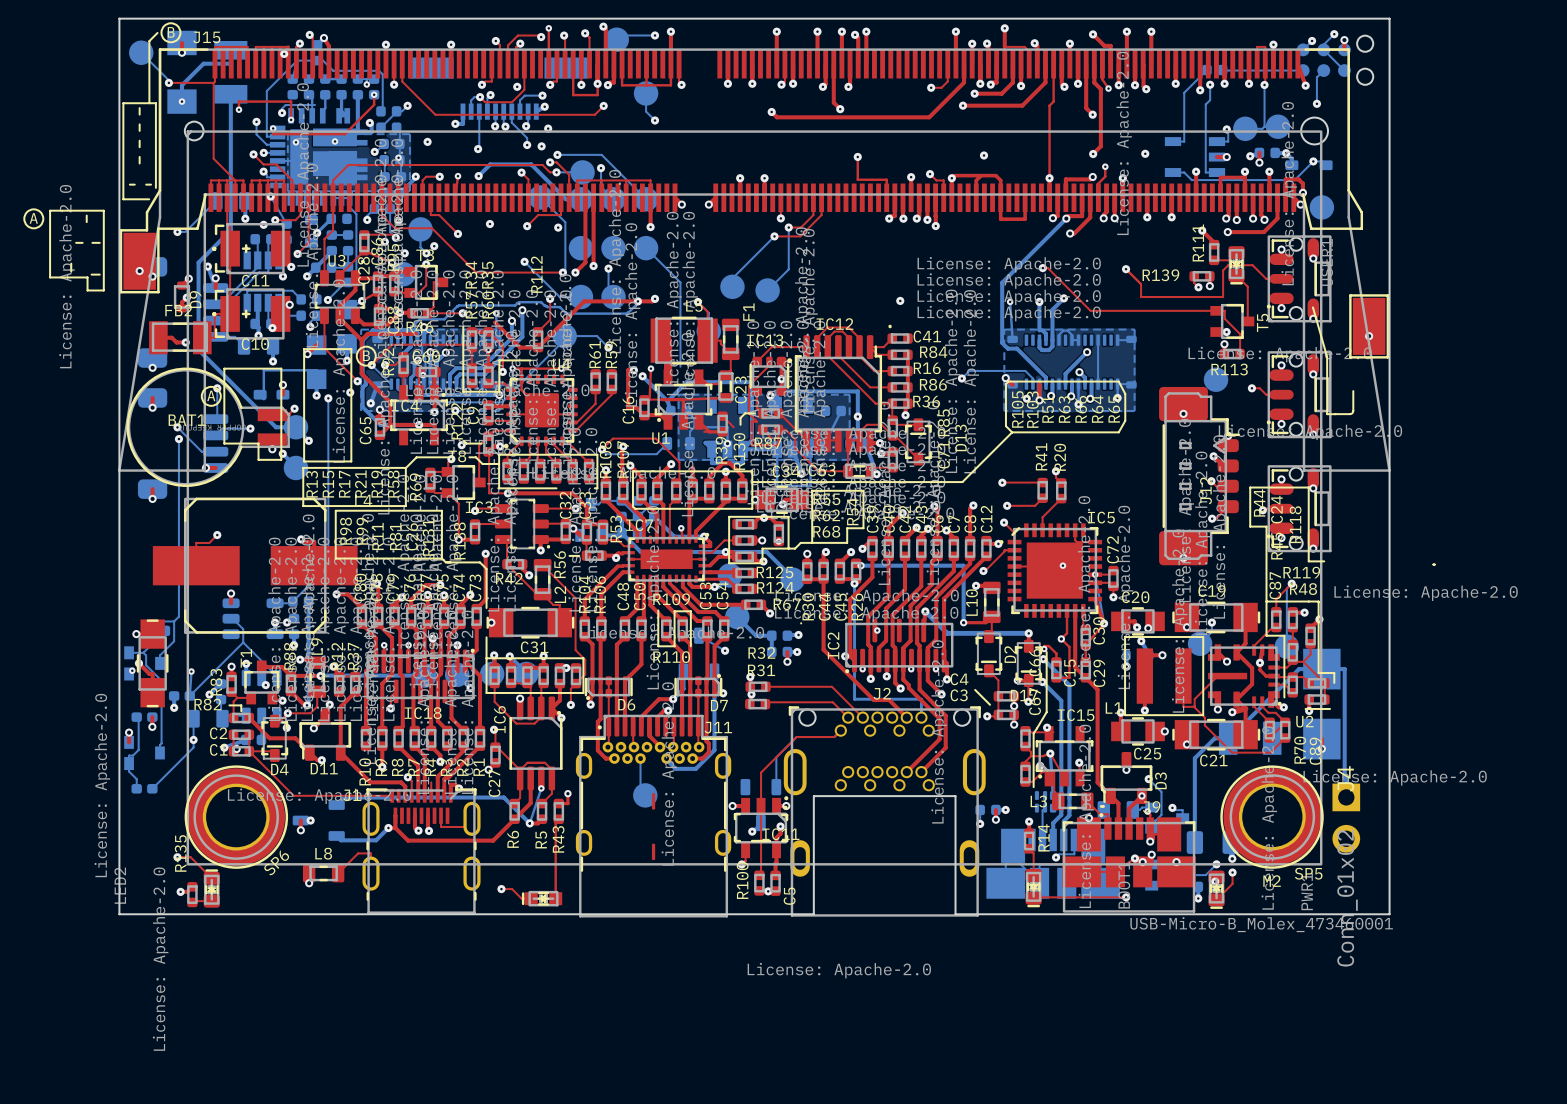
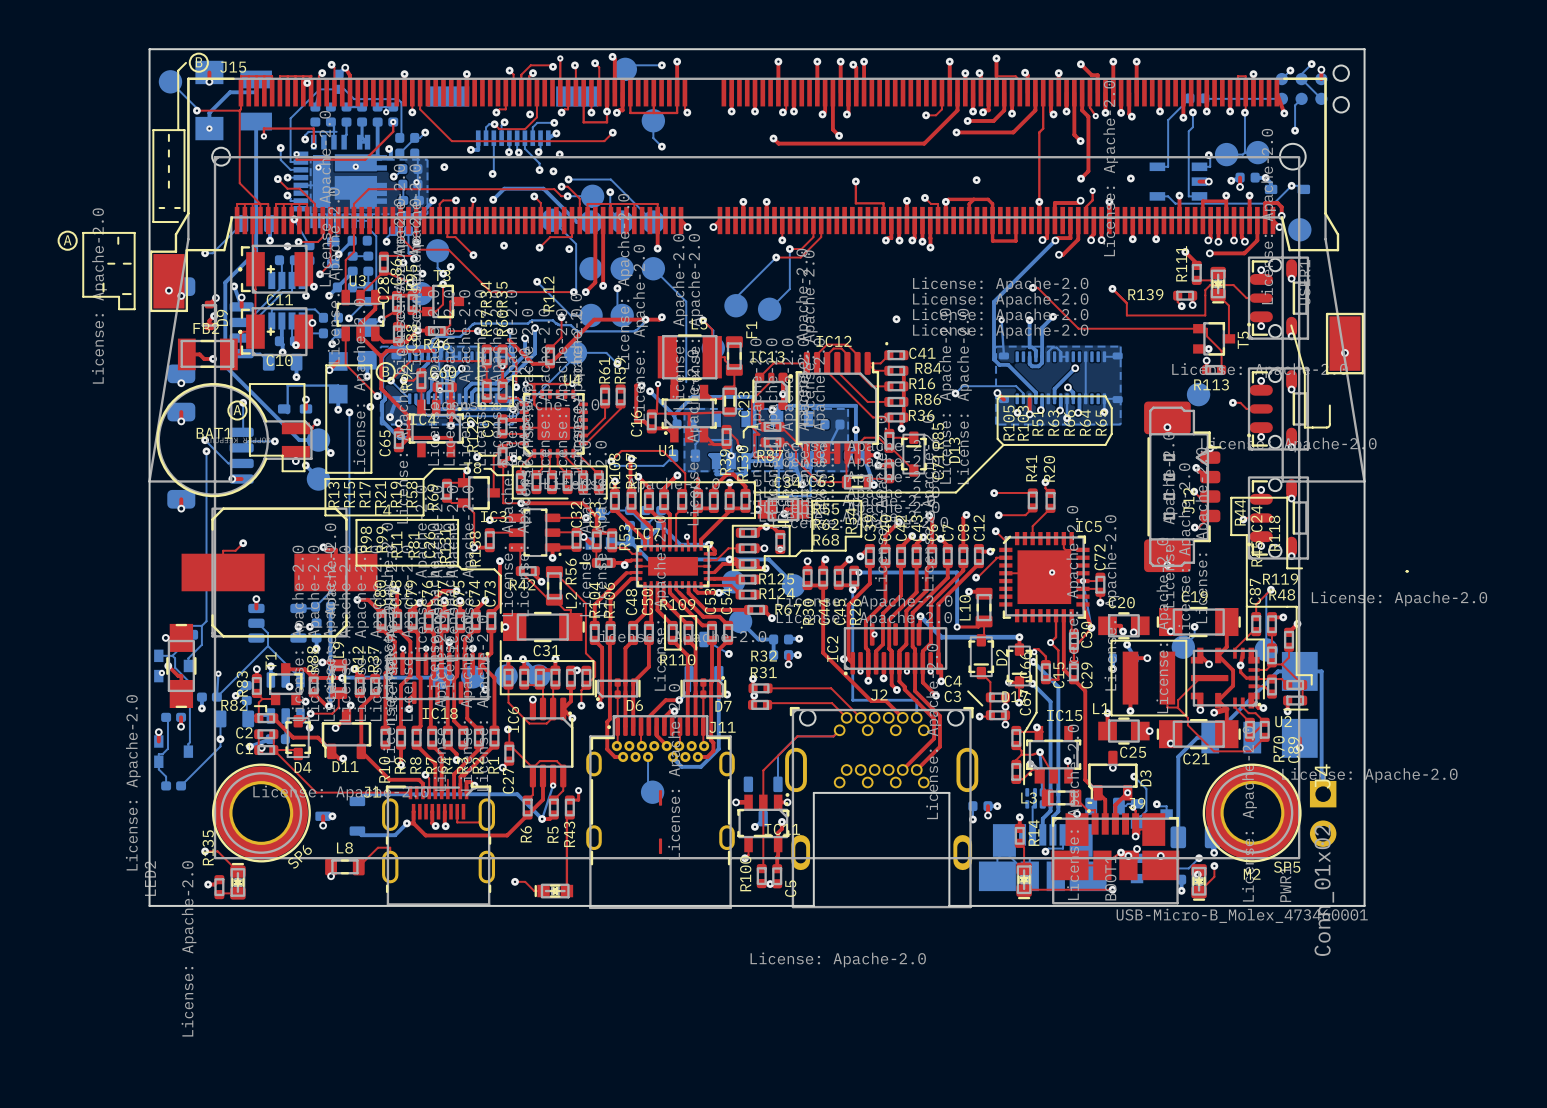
top track: none -> (737, 440) (739, 447)
via: none -> (739, 447)

